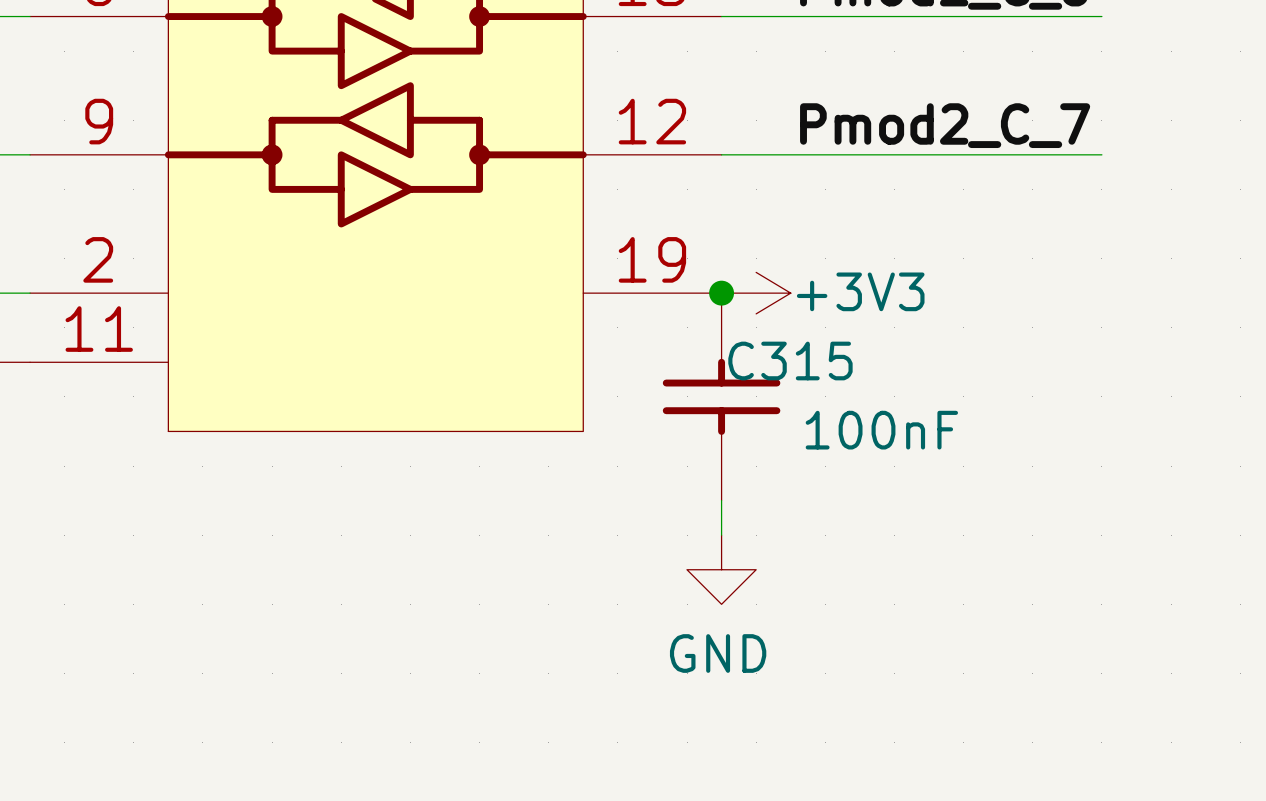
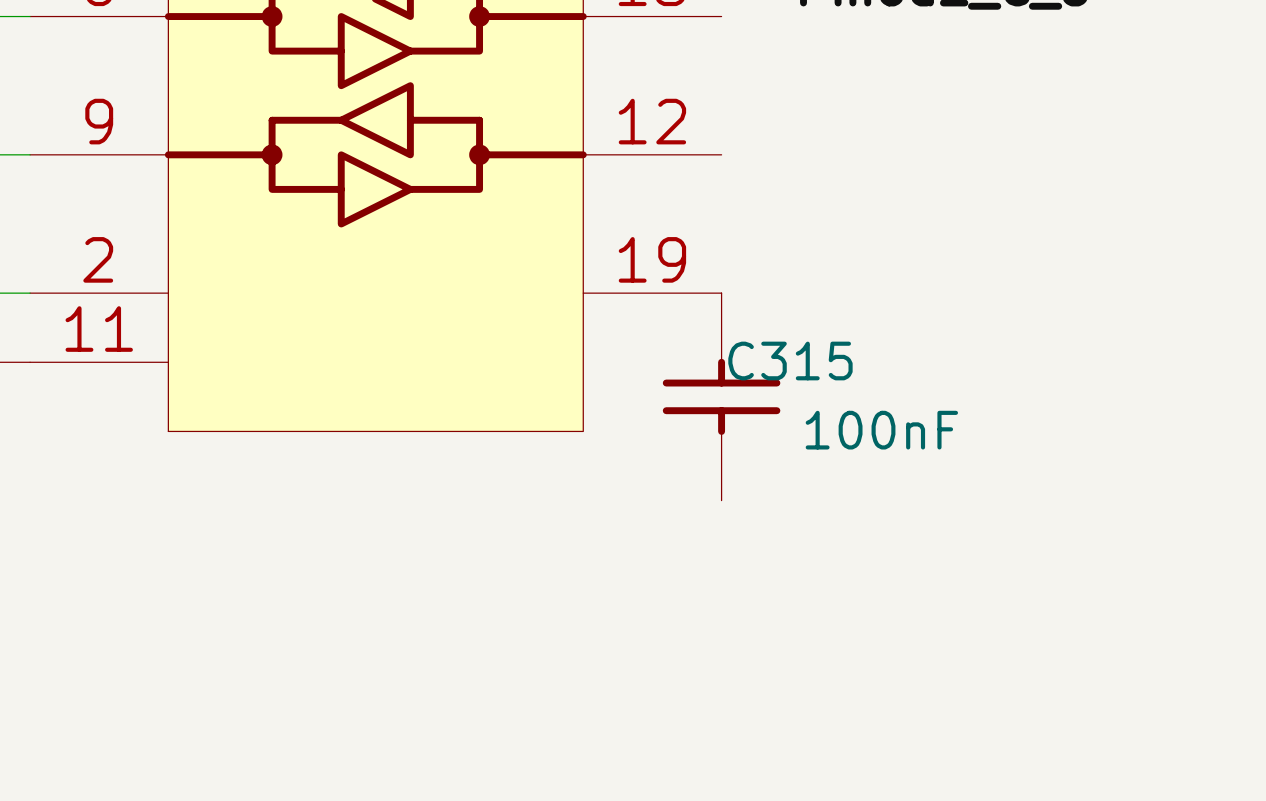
wire: (721, 16) (1101, 16) -> none
label: Pmod2_C_7 (945, 125) -> none
wire: (721, 154) (1101, 154) -> none
junction: (721, 293) -> none
power symbol: +3V3 (756, 293) -> none
wire: (721, 500) (721, 535) -> none
power symbol: GND (721, 569) -> none

